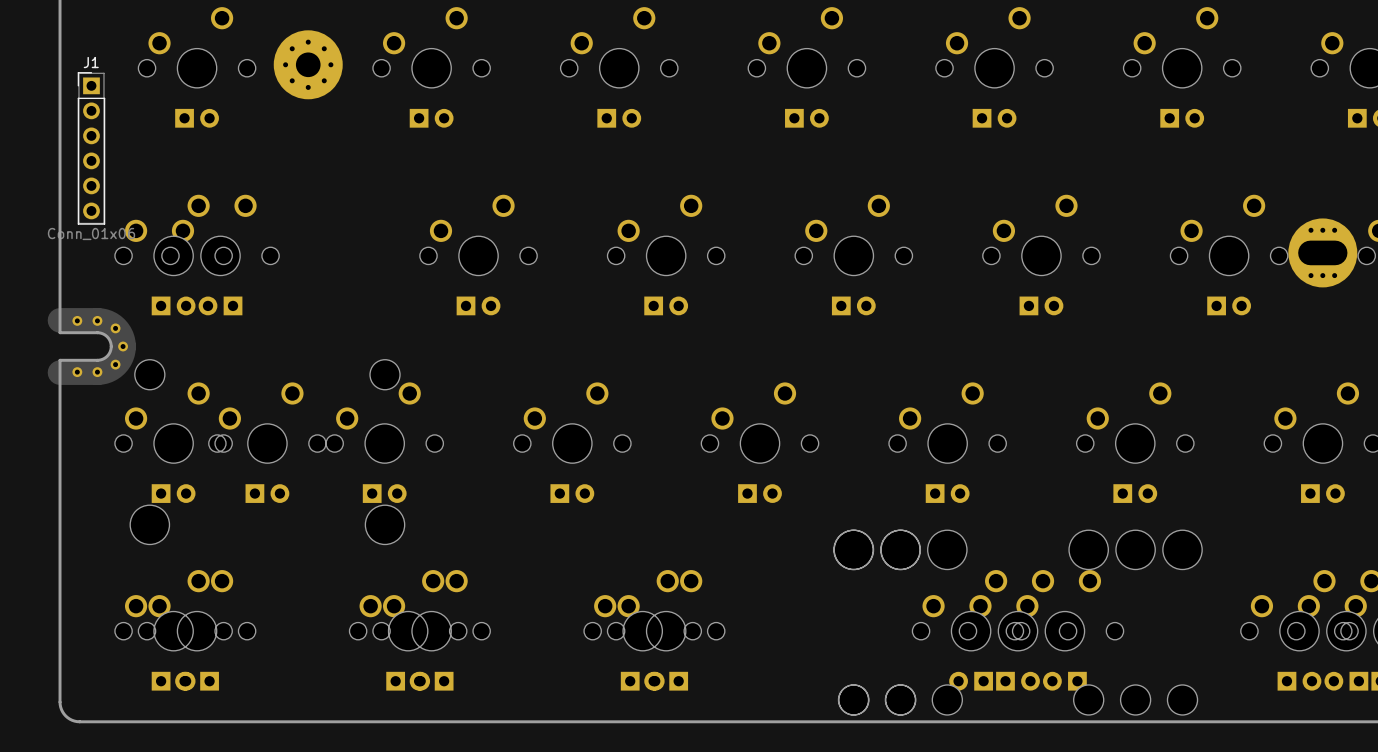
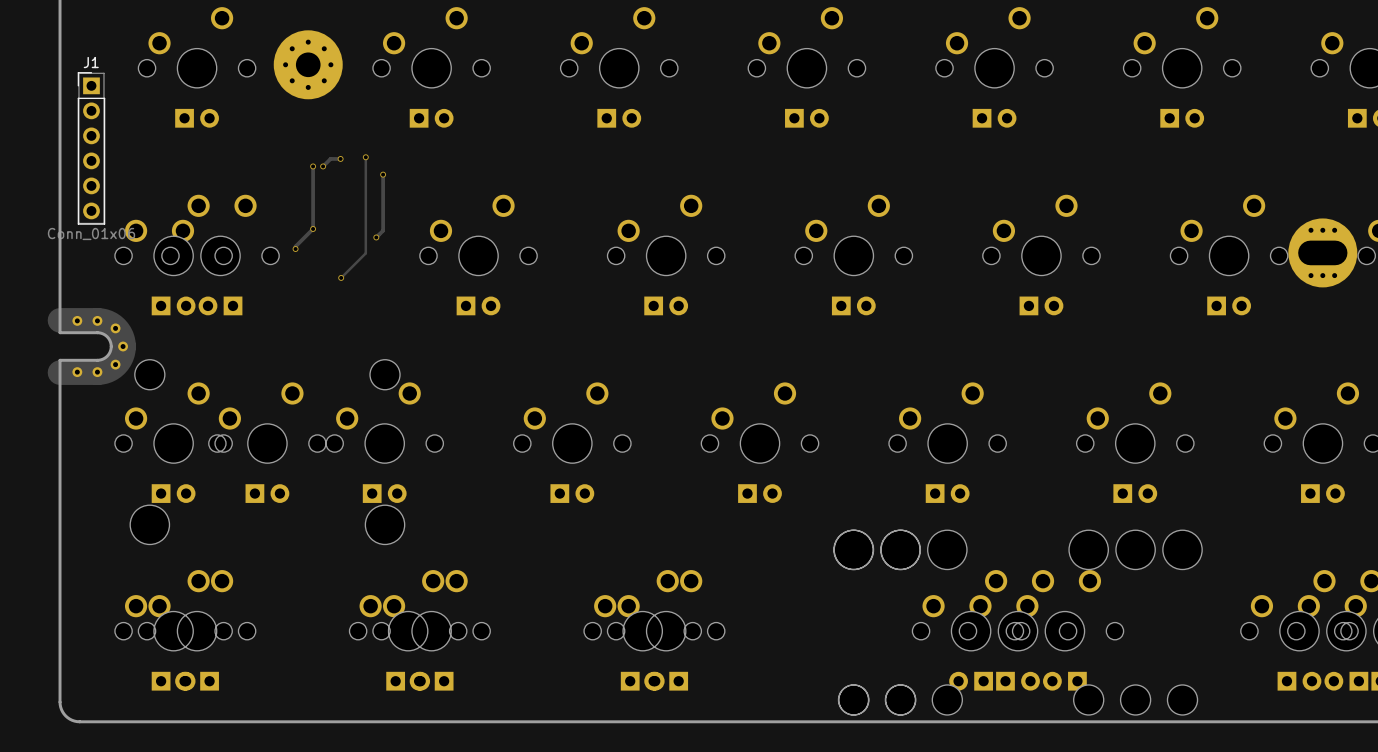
track: none -> (365, 157) (365, 253) (341, 277)
via: none -> (365, 157)
track: none -> (340, 158) (330, 158) (323, 166)
via: none -> (340, 158)
track: none -> (313, 166) (313, 228) (295, 246) (295, 249)
via: none -> (313, 166)
via: none -> (323, 166)
track: none -> (383, 174) (383, 230) (376, 237)
via: none -> (383, 174)
via: none -> (313, 228)
via: none -> (376, 237)
via: none -> (295, 249)
via: none -> (341, 277)

